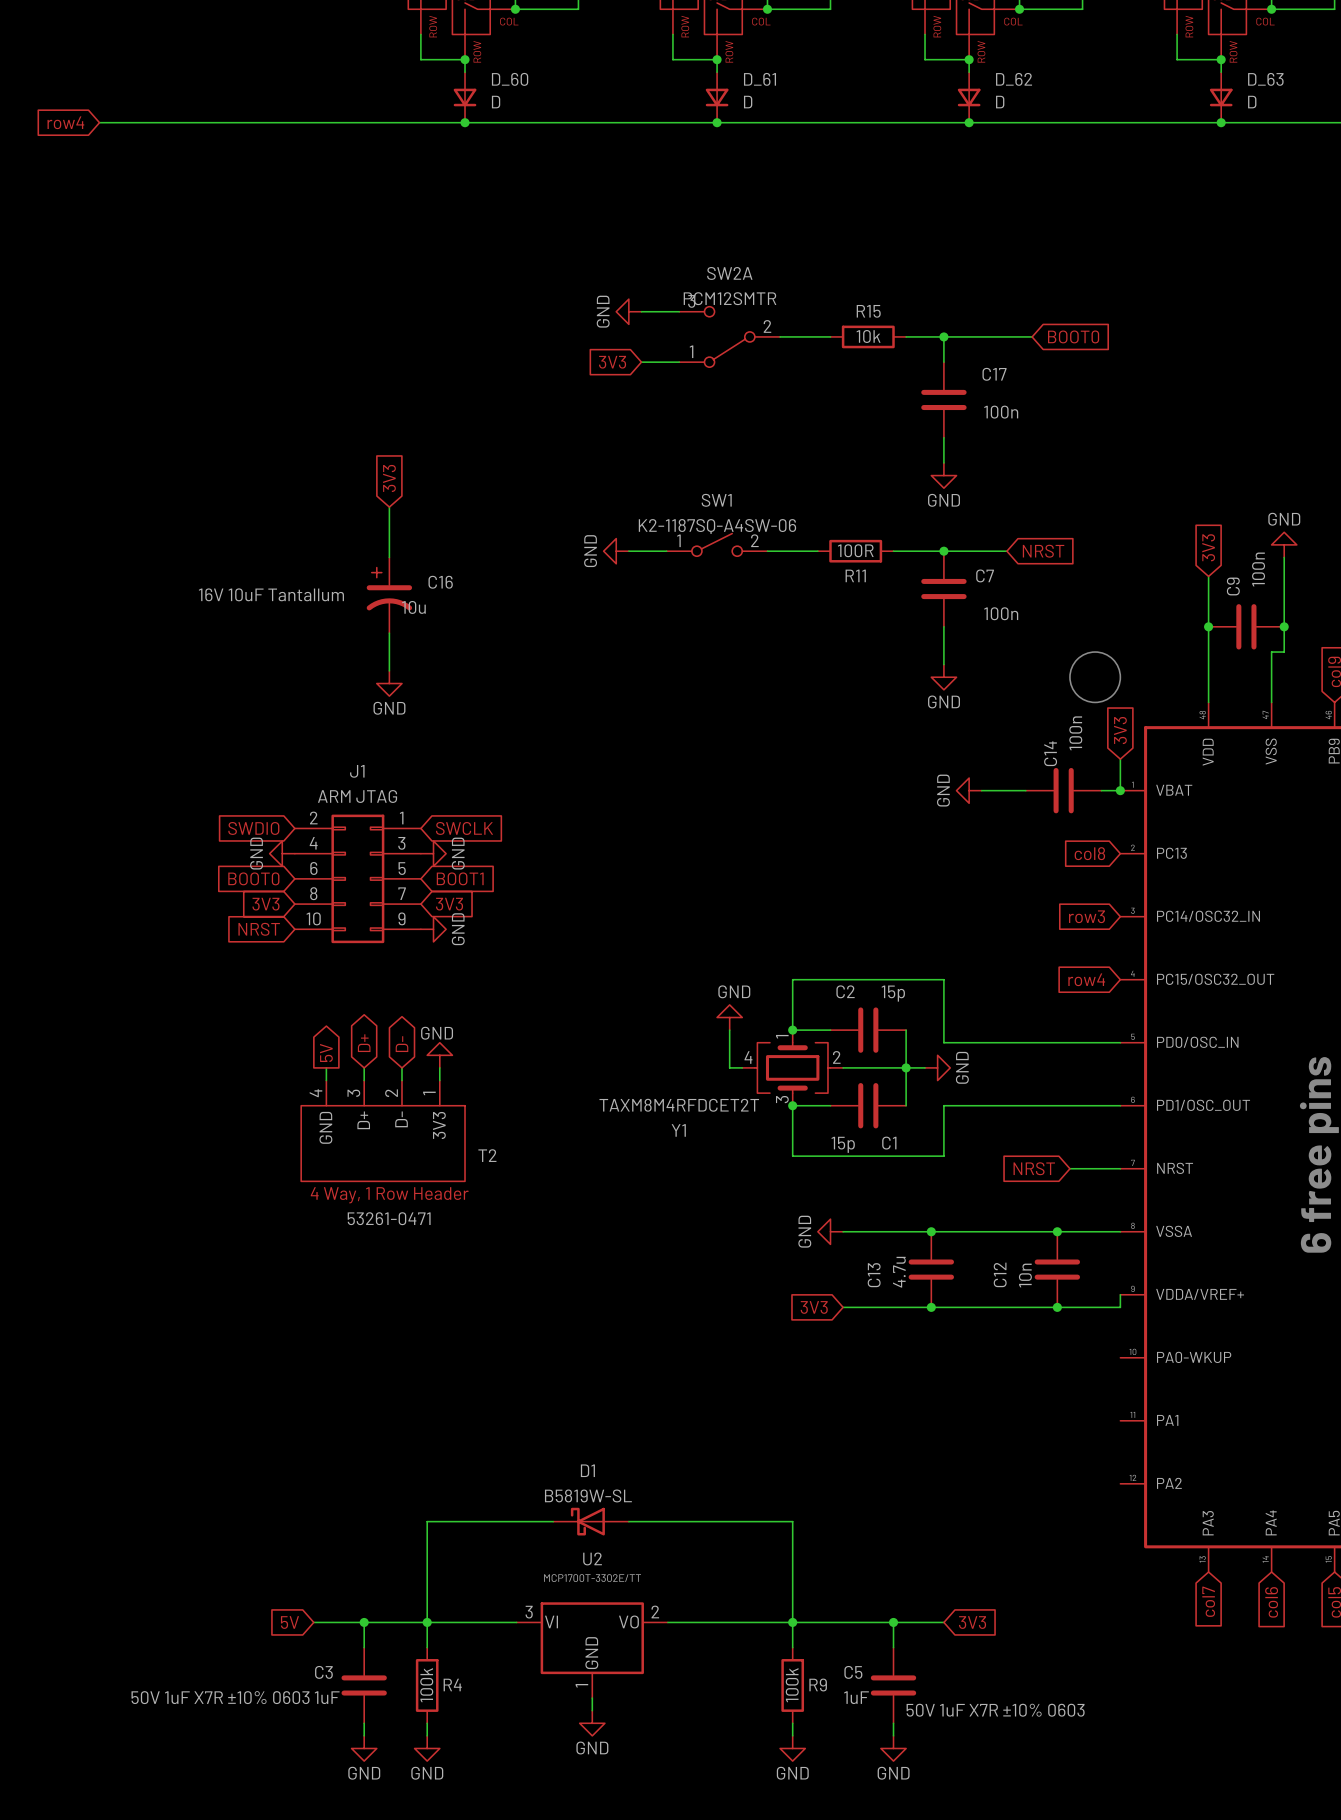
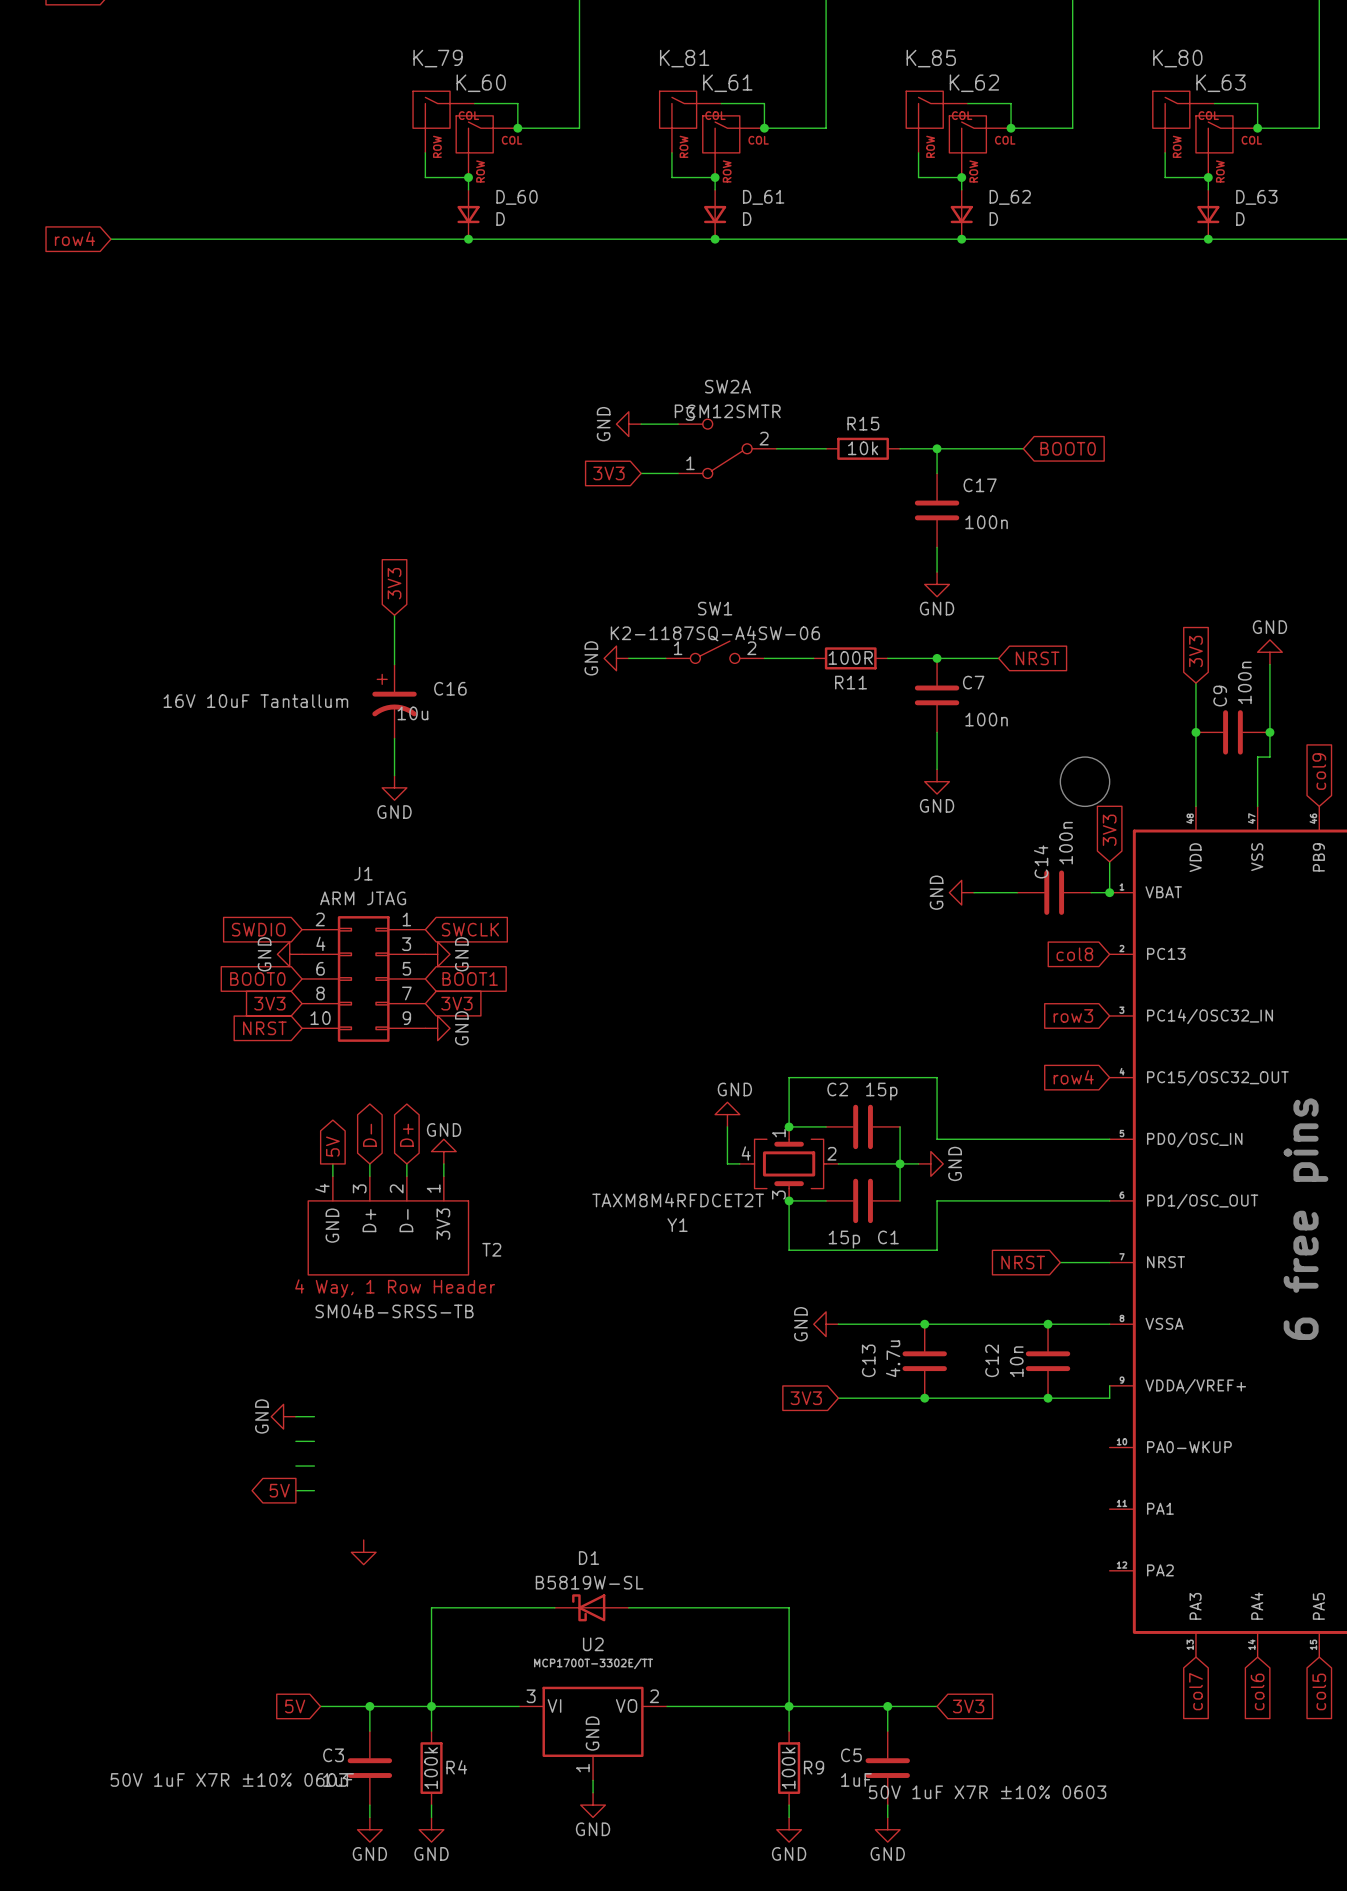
global label: D+ (364, 1043) -> D- (369, 1135)
global label: D- (401, 1044) -> D+ (406, 1135)
T2 value: 53261-0471 (389, 1218) -> SM04B-SRSS-TB (394, 1311)
power symbol: none -> GND (283, 1416)
wire: none -> (295, 1416) (314, 1416)
wire: none -> (295, 1441) (314, 1441)
wire: none -> (295, 1466) (314, 1466)
global label: none -> 5V (279, 1490)
wire: none -> (295, 1490) (314, 1490)
power symbol: none -> (363, 1552)

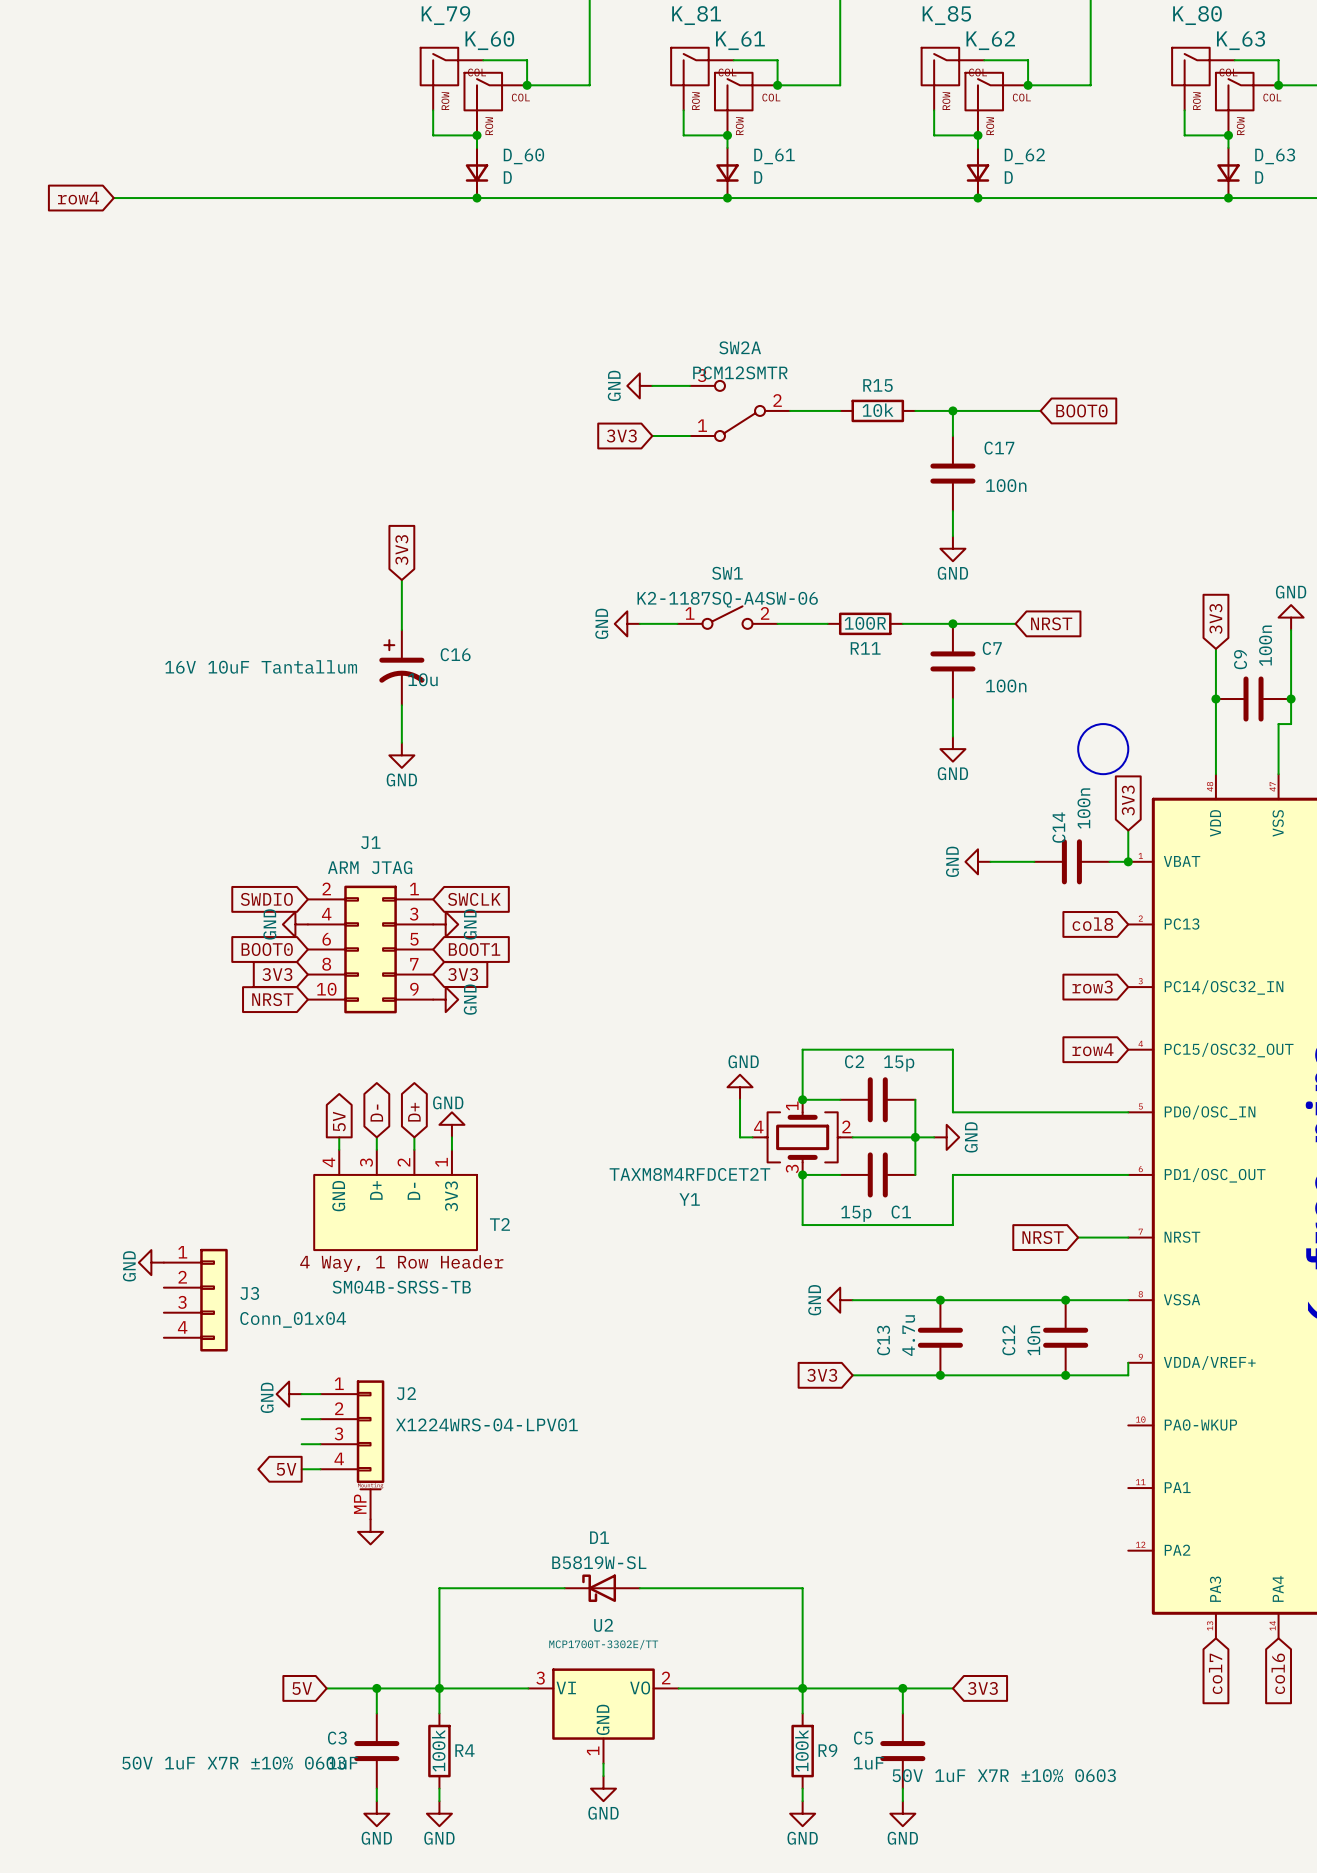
power symbol: none -> GND (151, 1262)
J3: none -> Conn_01x04 (195, 1300)
J2: none -> X1224WRS-04-LPV01 (352, 1449)

